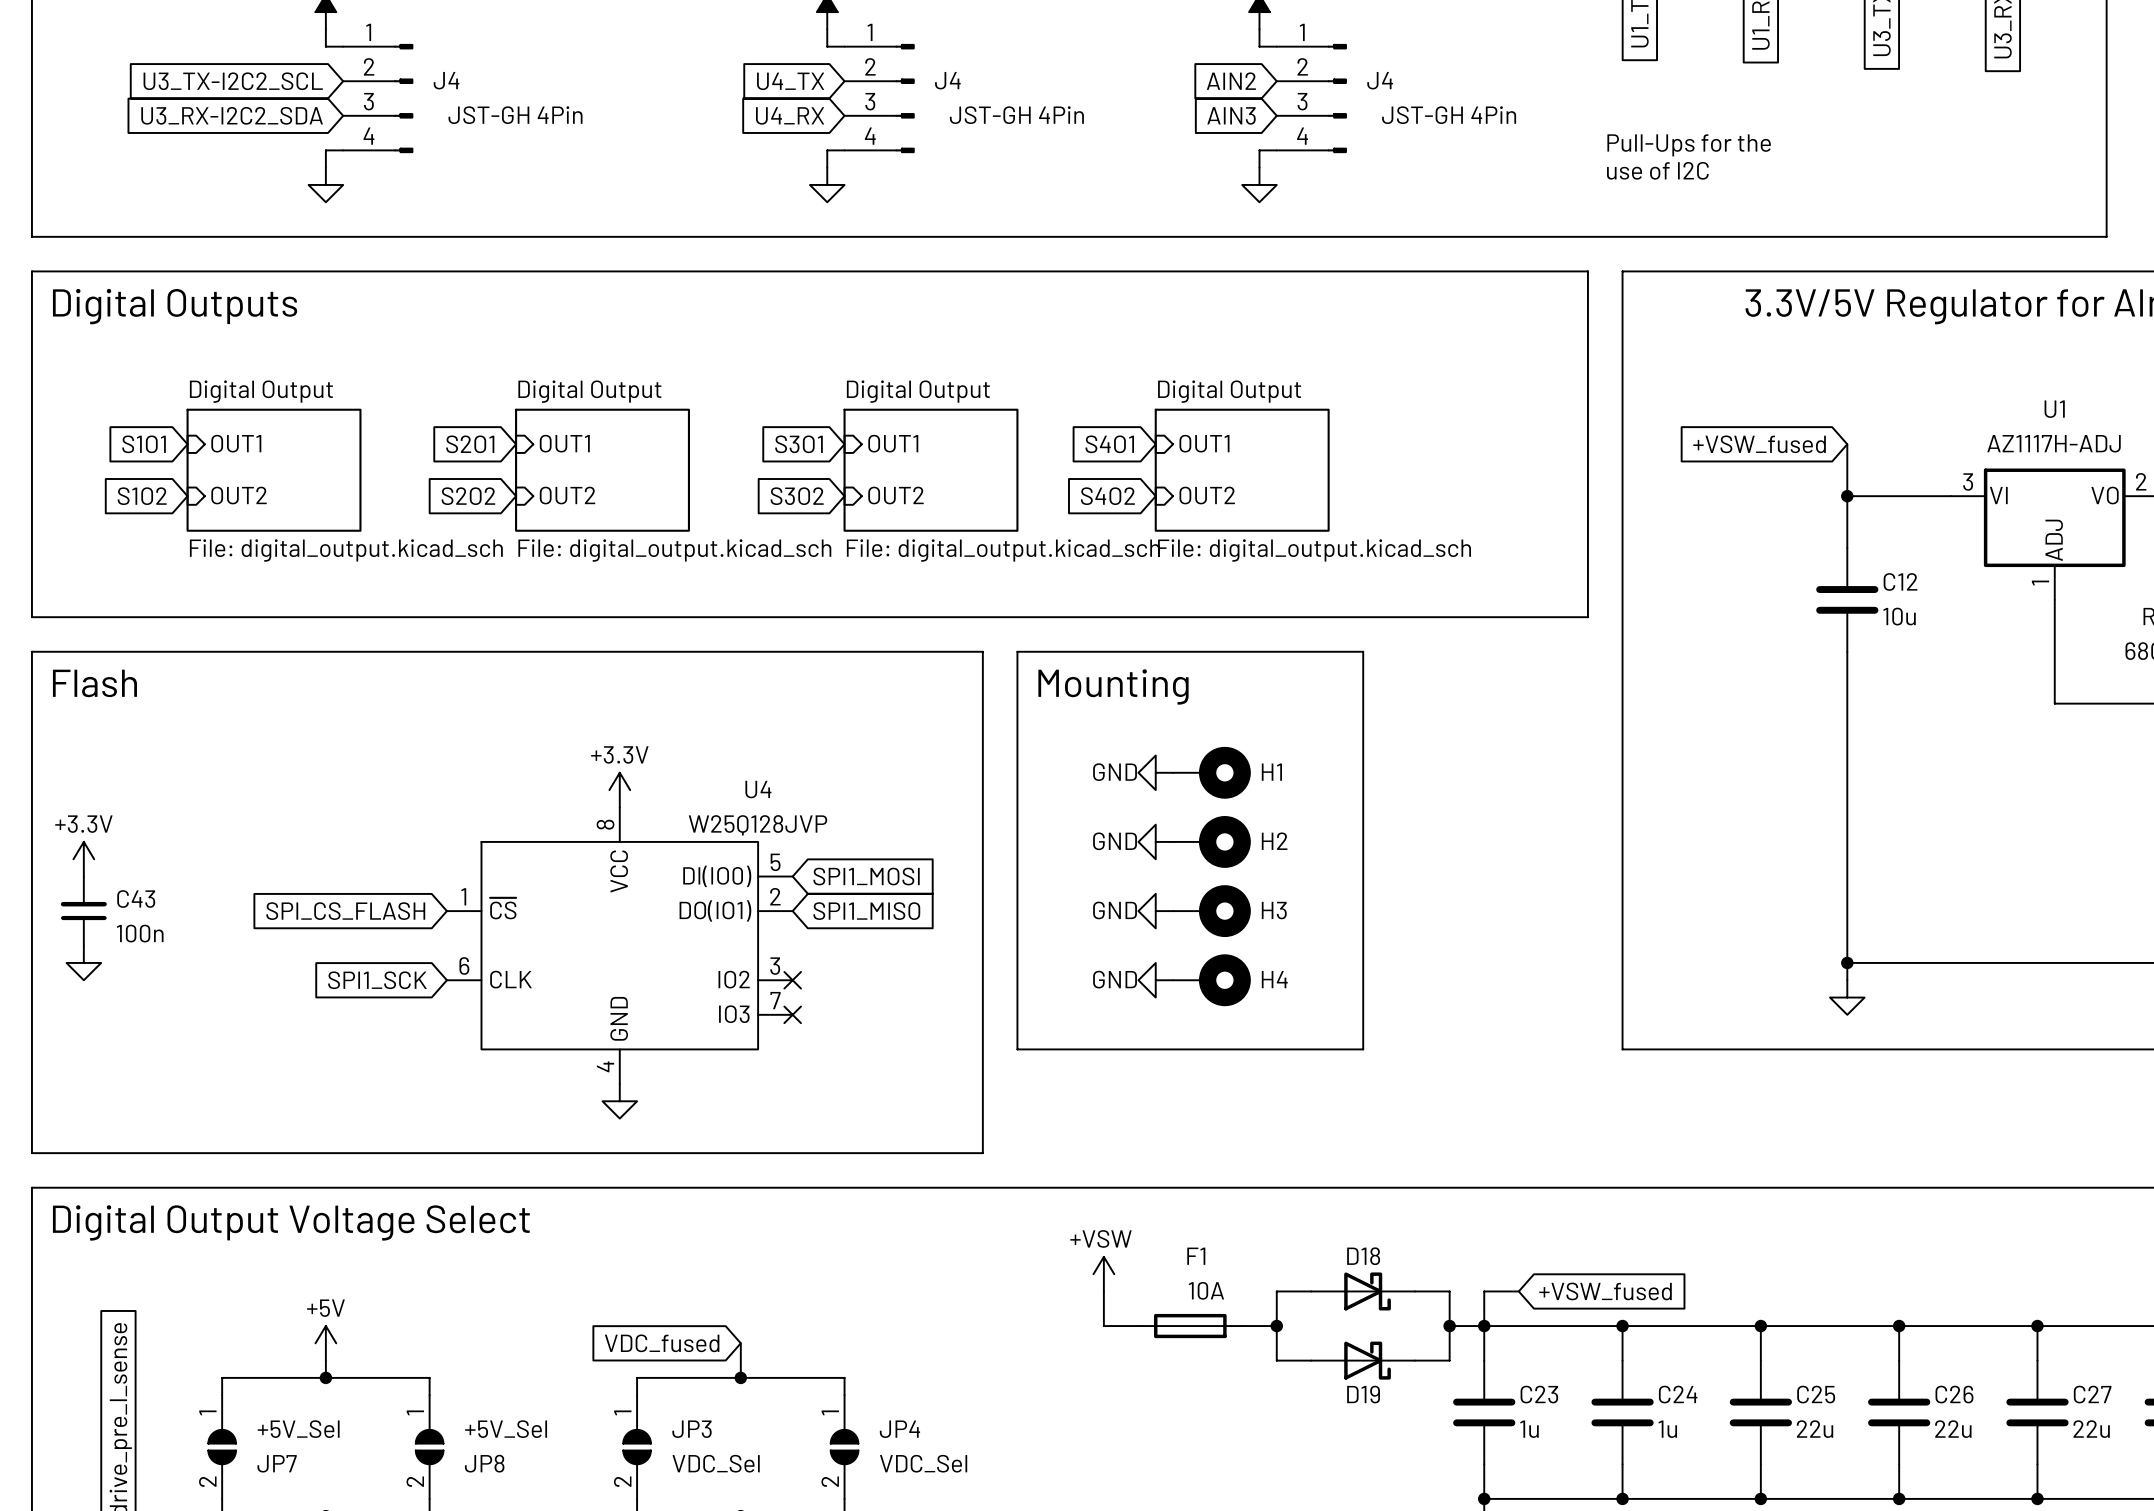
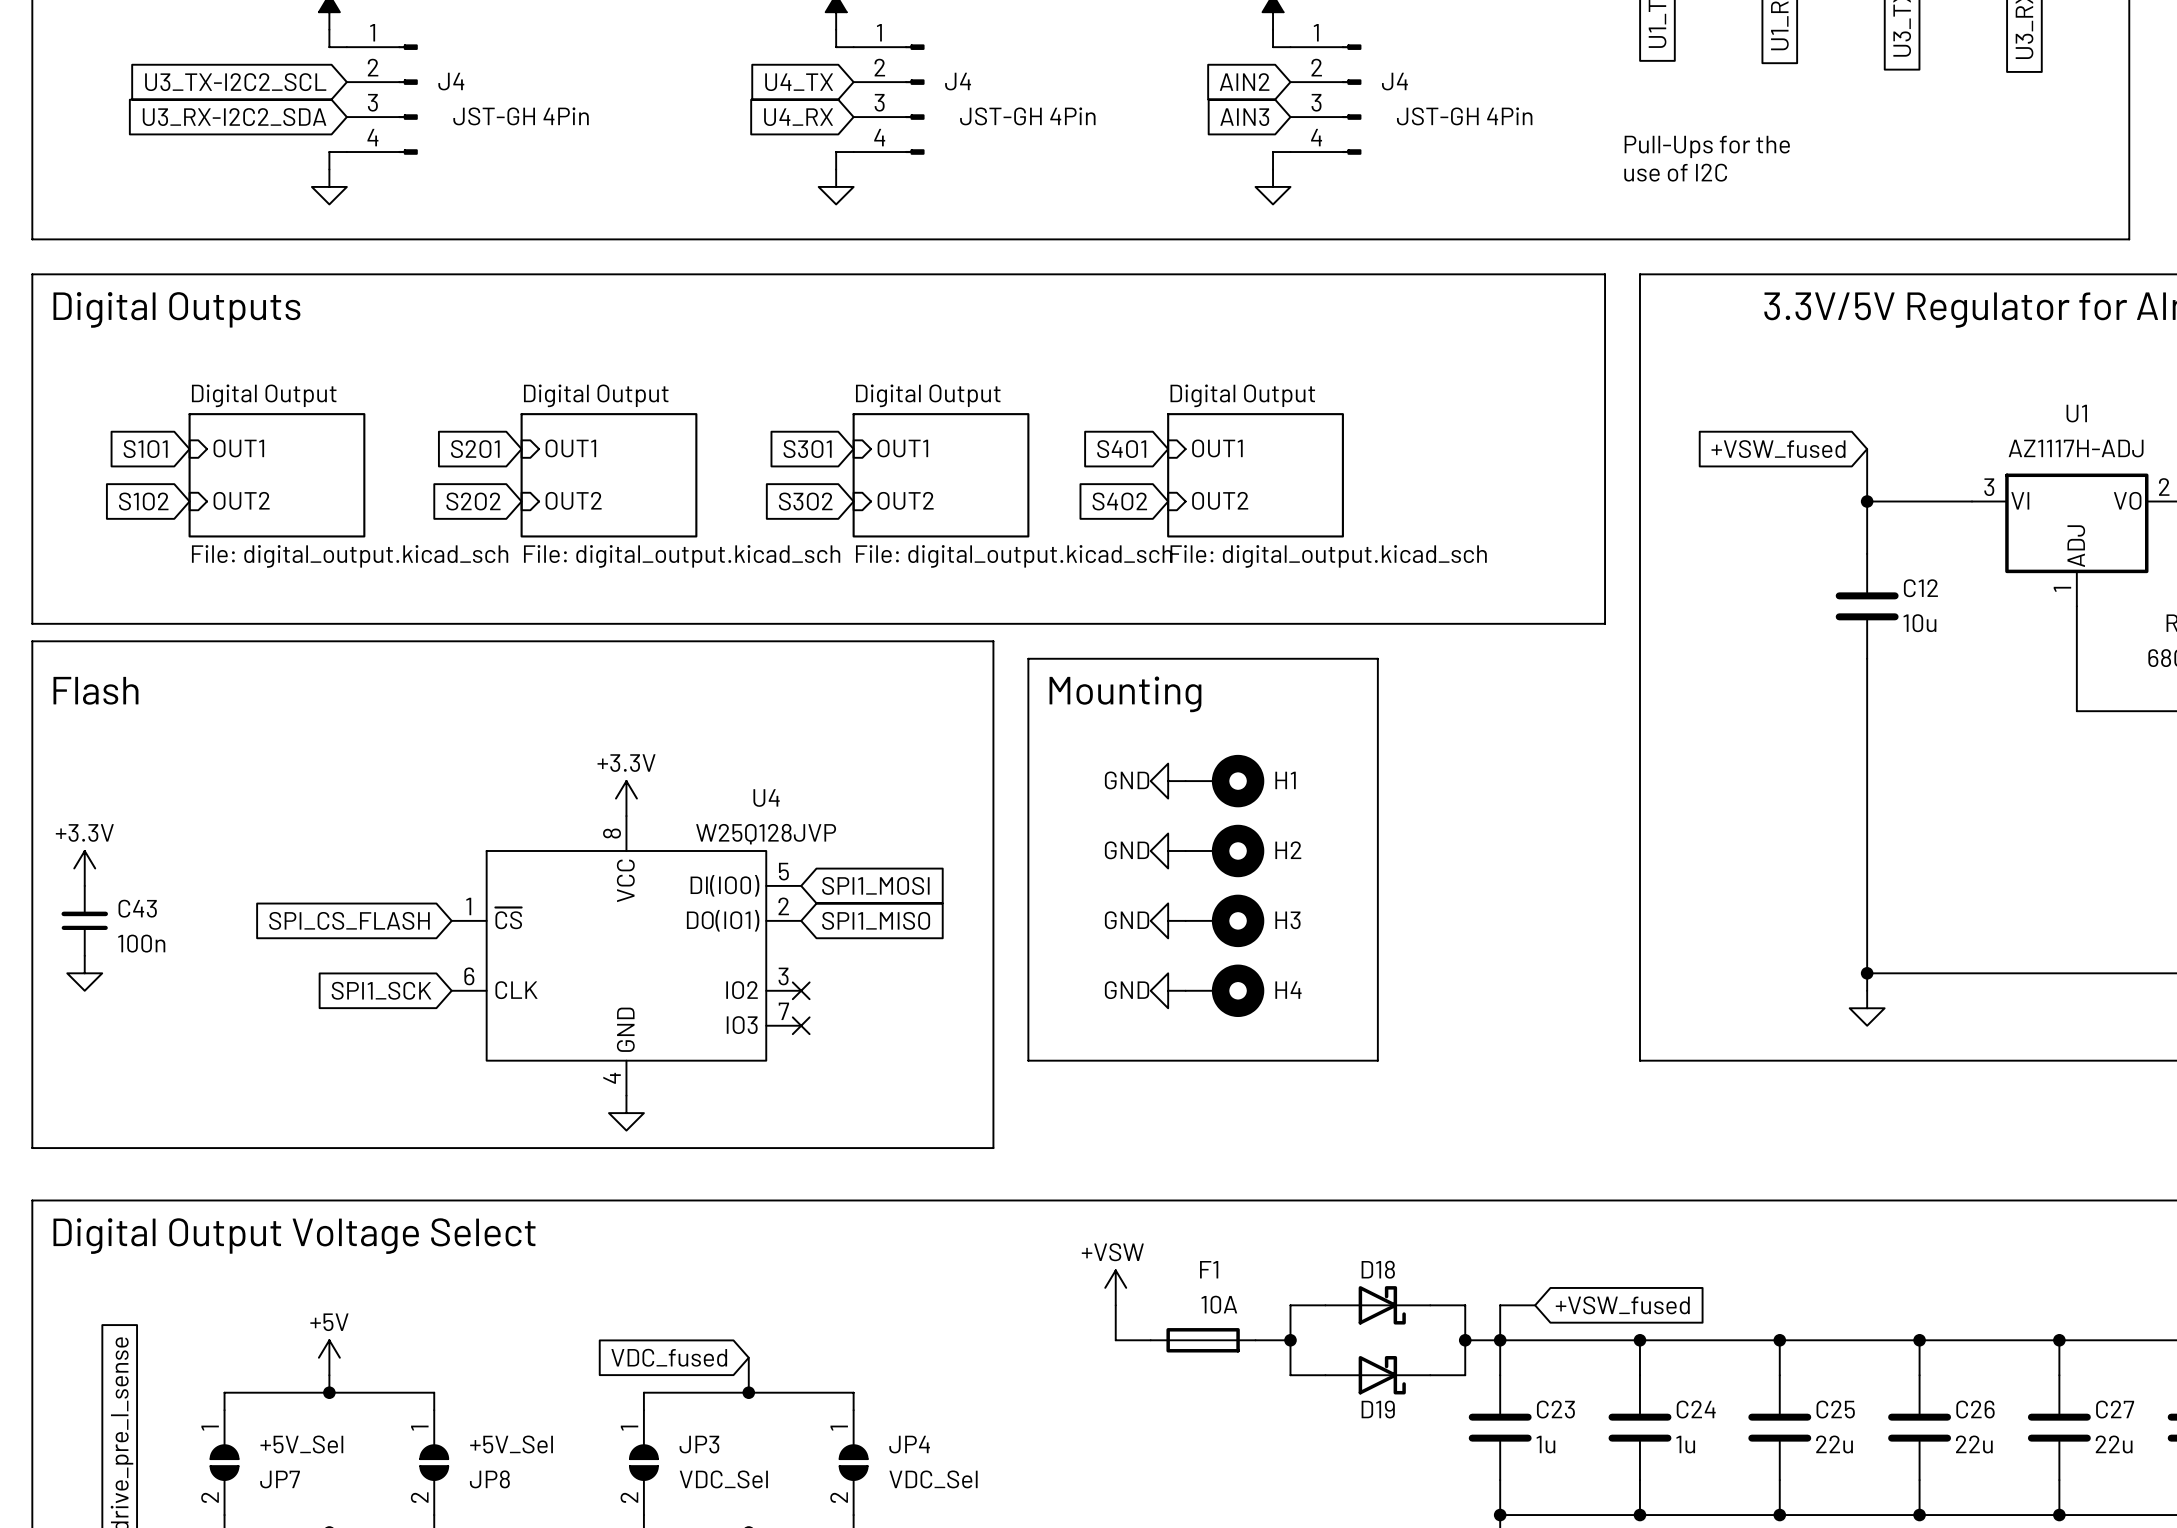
line: (31, 651) (982, 651) -> (32, 658) (32, 641) (993, 641) (993, 658)
line: (31, 1135) (31, 1153) (982, 1153) (982, 1135) -> (32, 1148) (993, 1148)

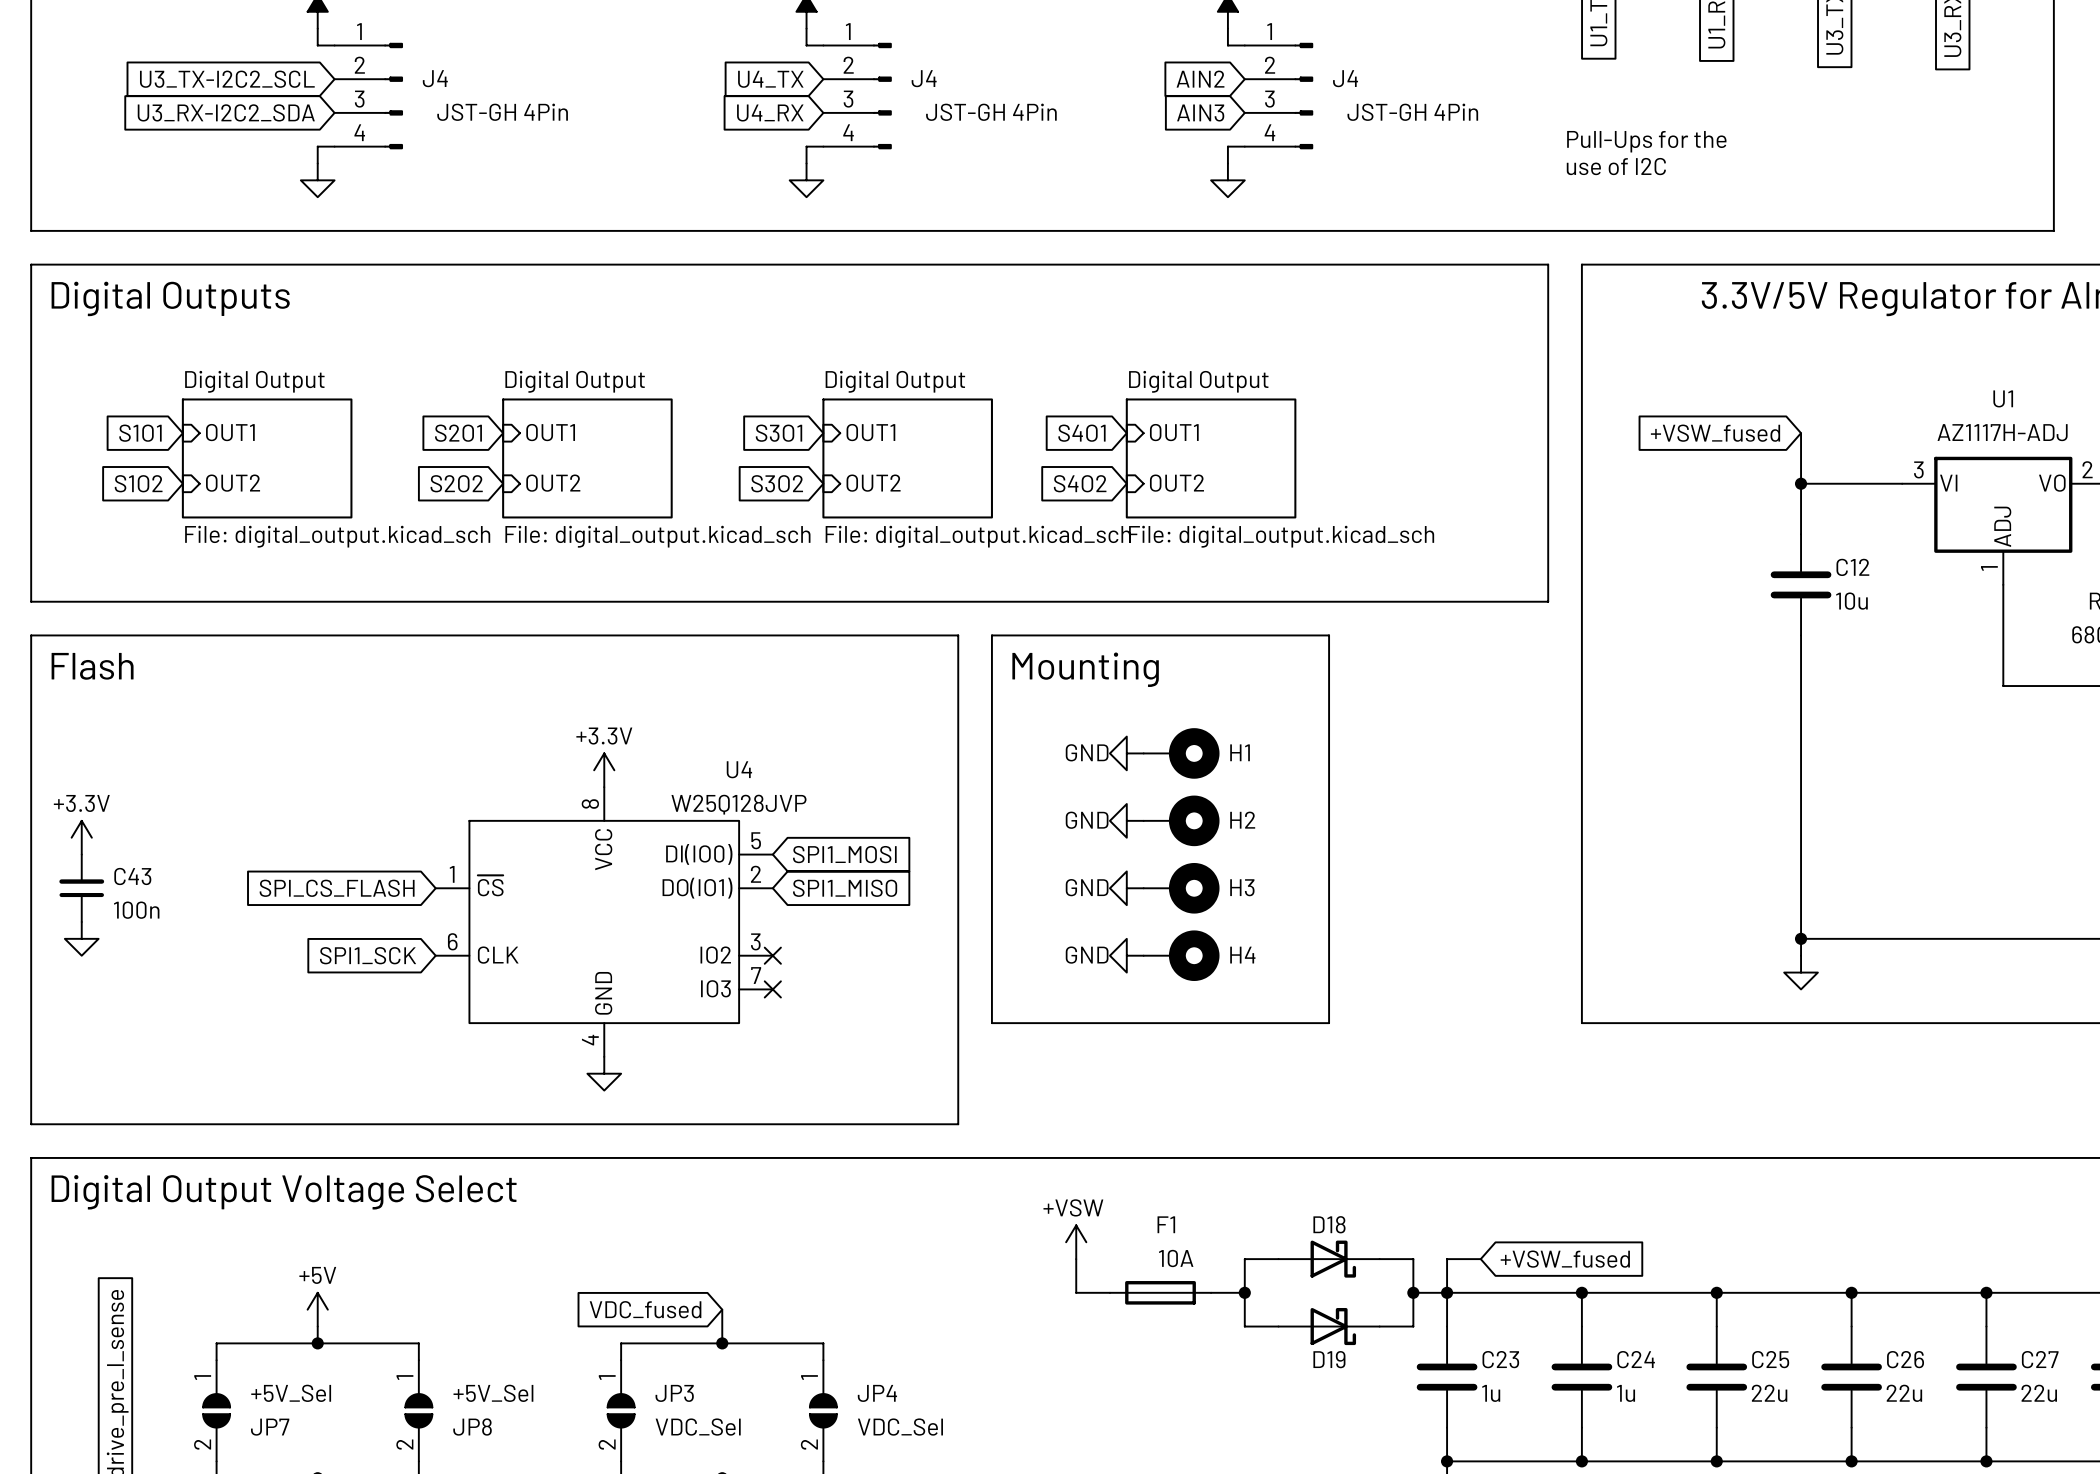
line: (32, 658) (32, 641) (993, 641) (993, 658) -> (31, 635) (958, 635)
line: (32, 1148) (993, 1148) -> (31, 1107) (31, 1124) (958, 1124) (958, 1107)

